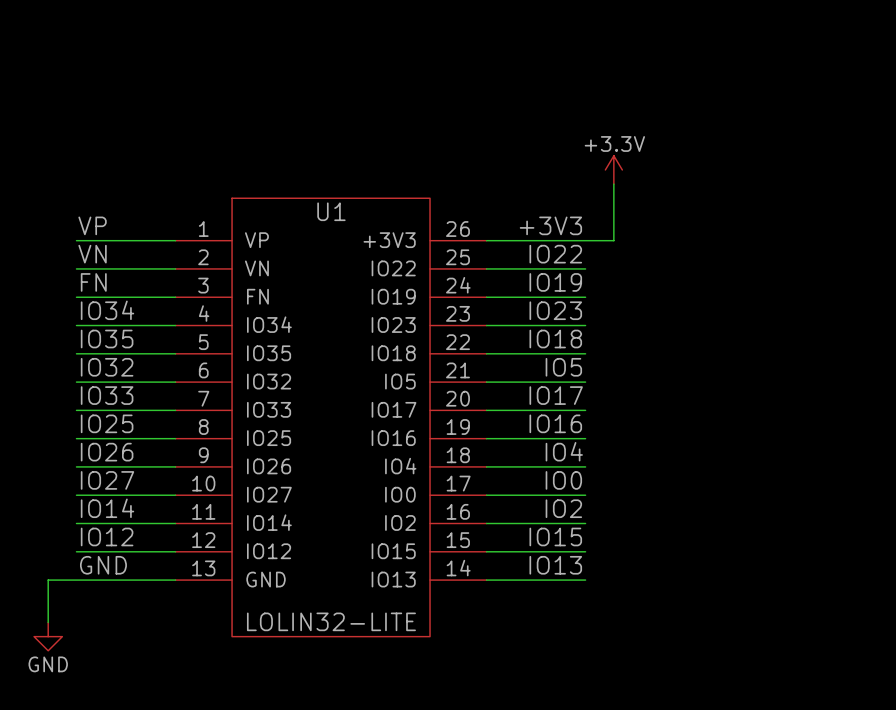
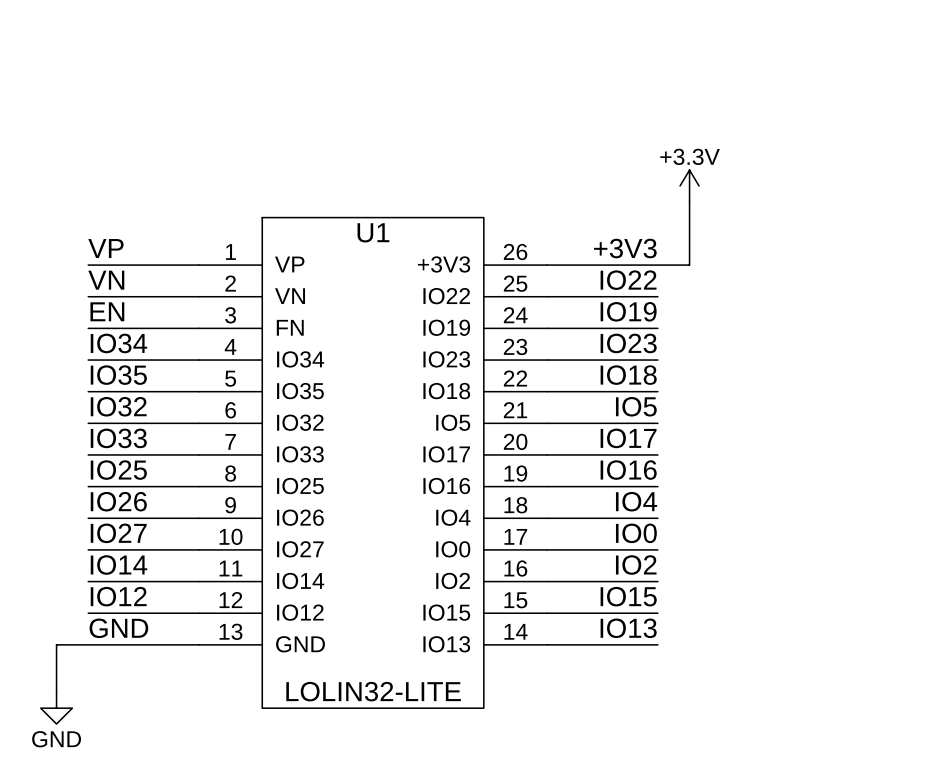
label: FN (93, 282) -> EN (107, 311)

